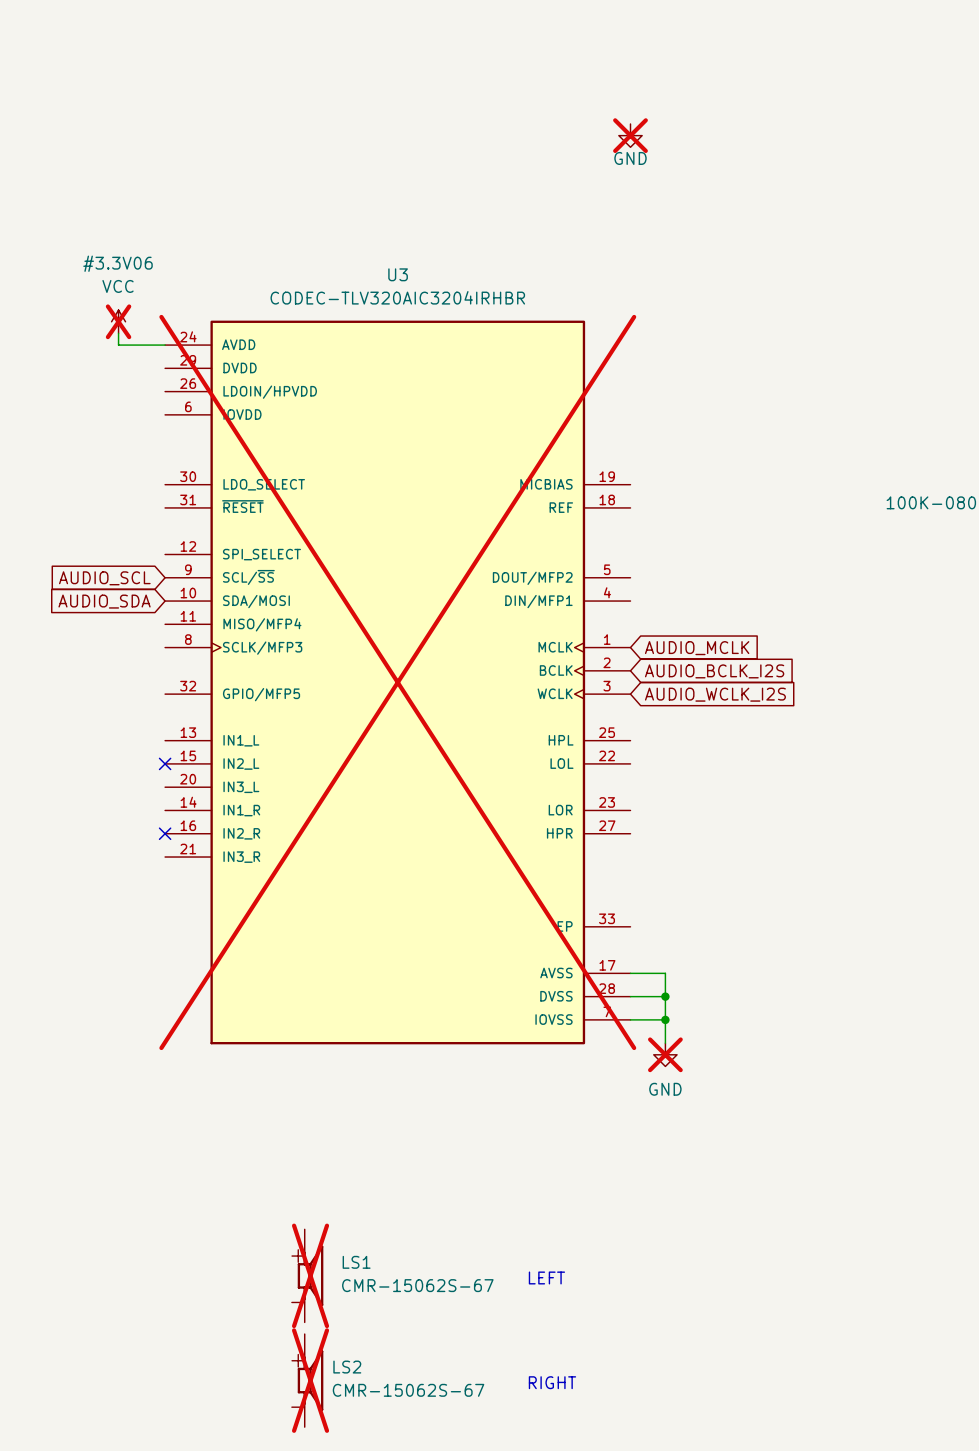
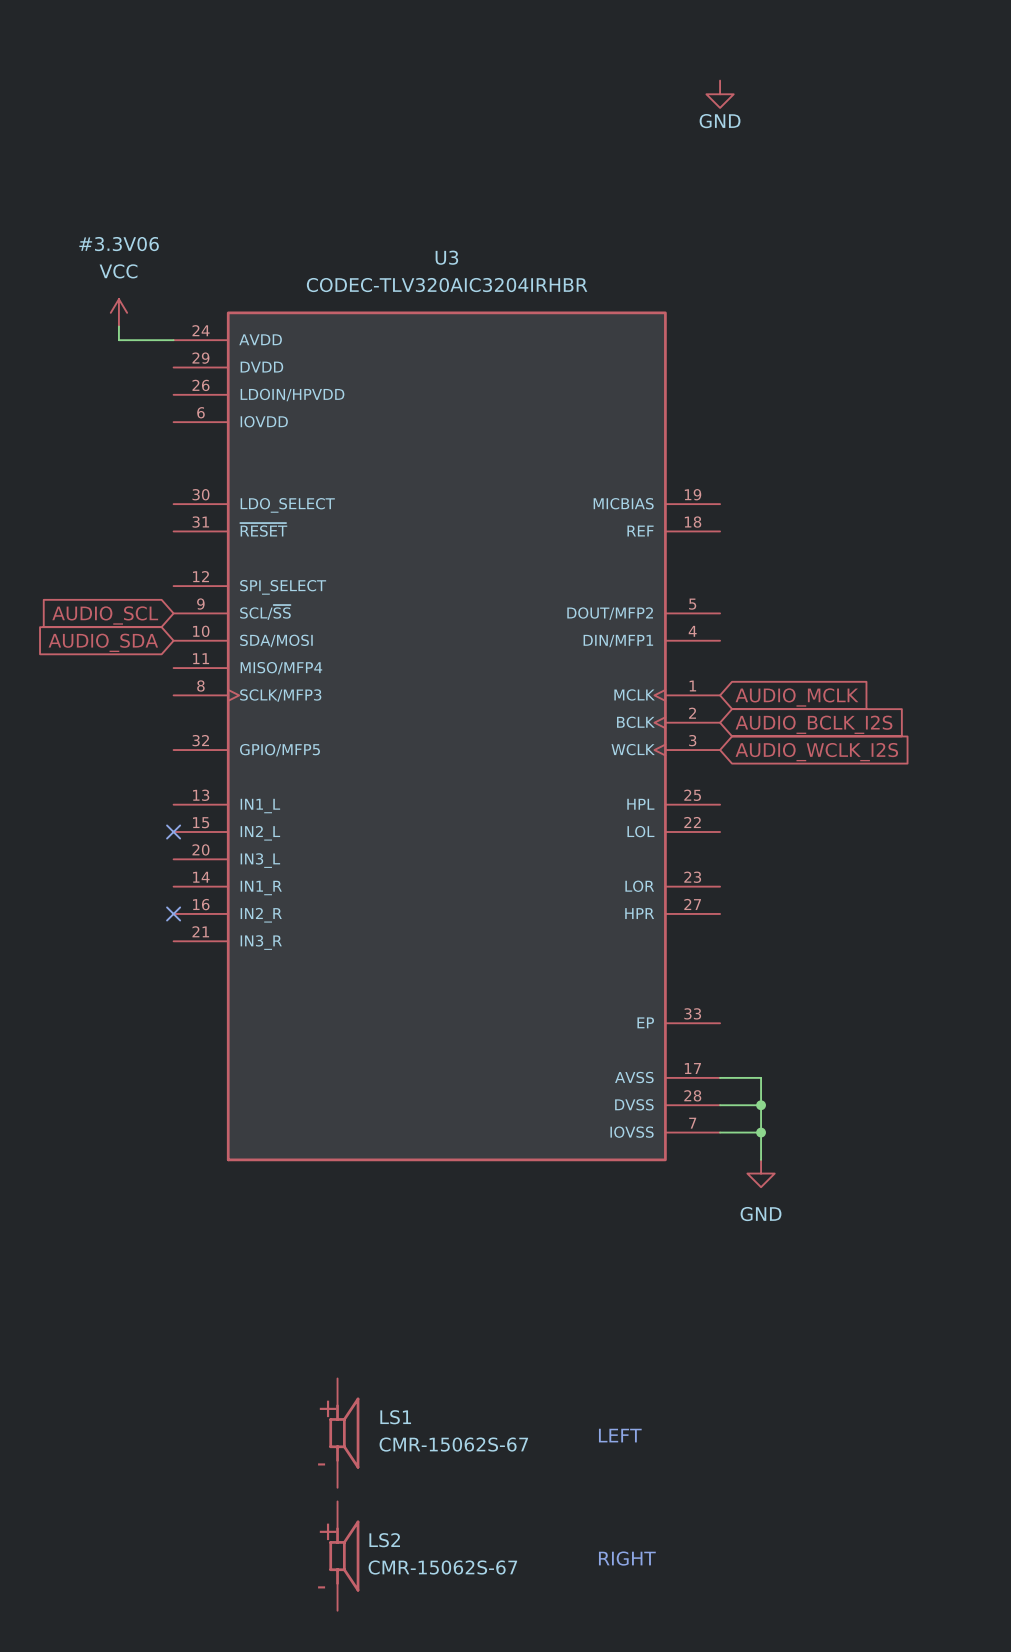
power symbol do-not-place cross: (630, 135) -> none
#3.3V06 do-not-place cross: (118, 321) -> none
U3 do-not-place cross: (397, 682) -> none
power symbol do-not-place cross: (665, 1054) -> none
LS1 do-not-place cross: (310, 1275) -> none
LS2 do-not-place cross: (310, 1380) -> none

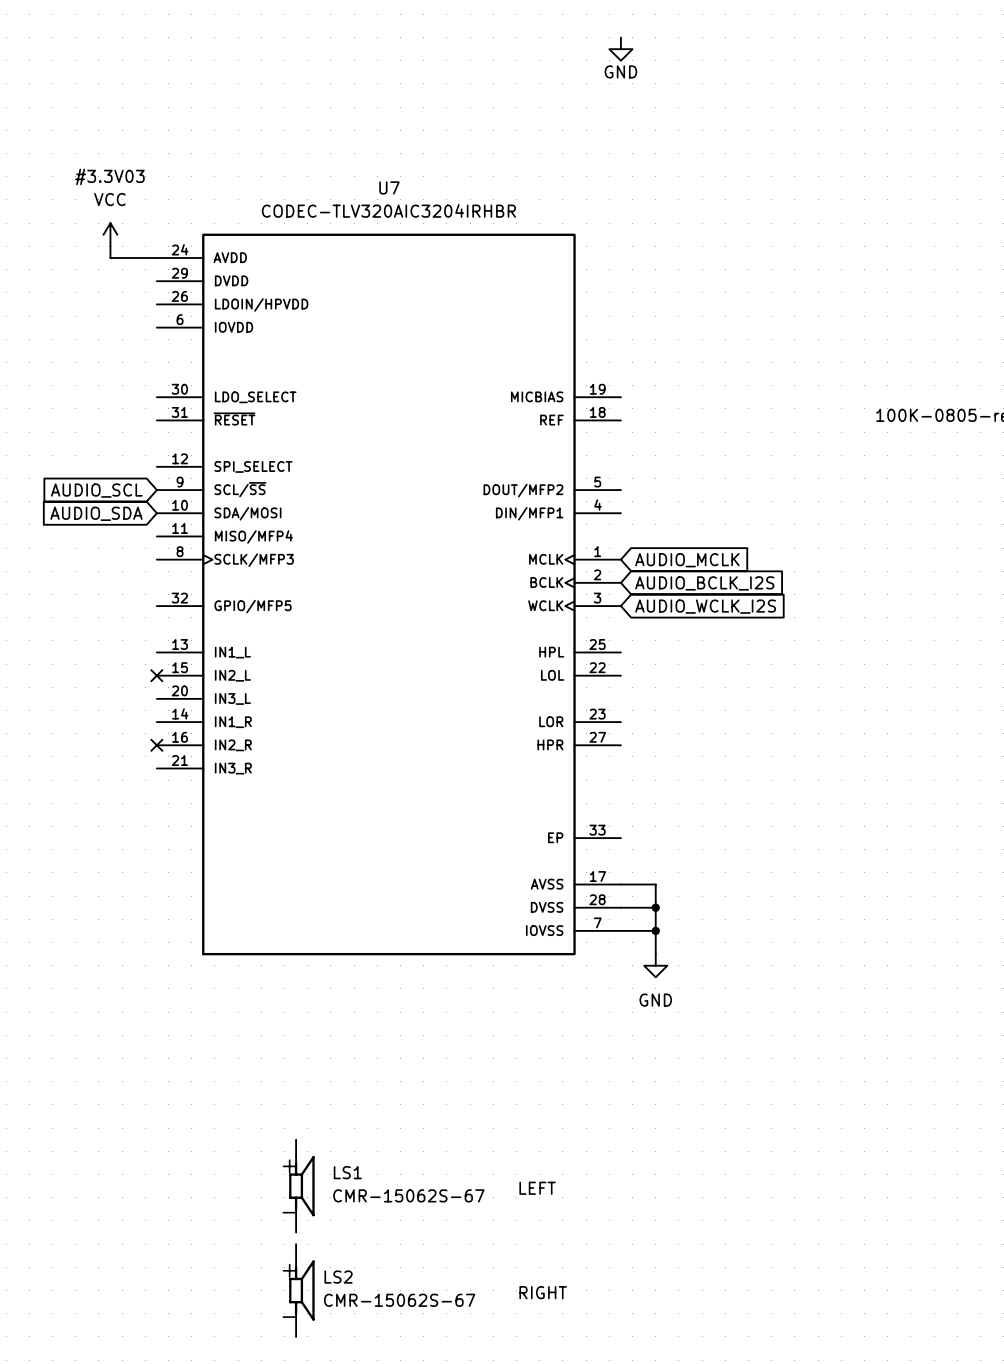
#3.3V06 name: #3.3V06 (119, 244) -> #3.3V03 (109, 176)
U3 name: U3 (446, 257) -> U7 (389, 187)

